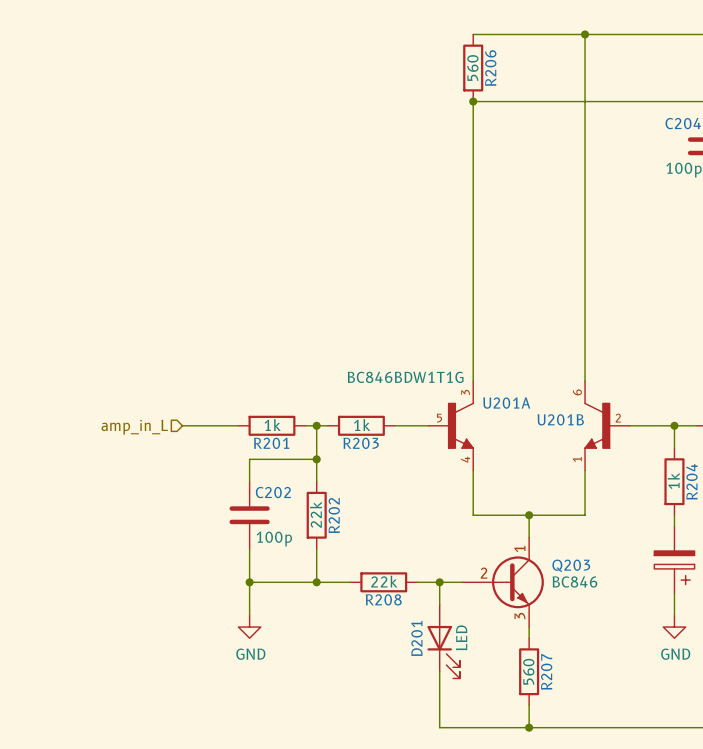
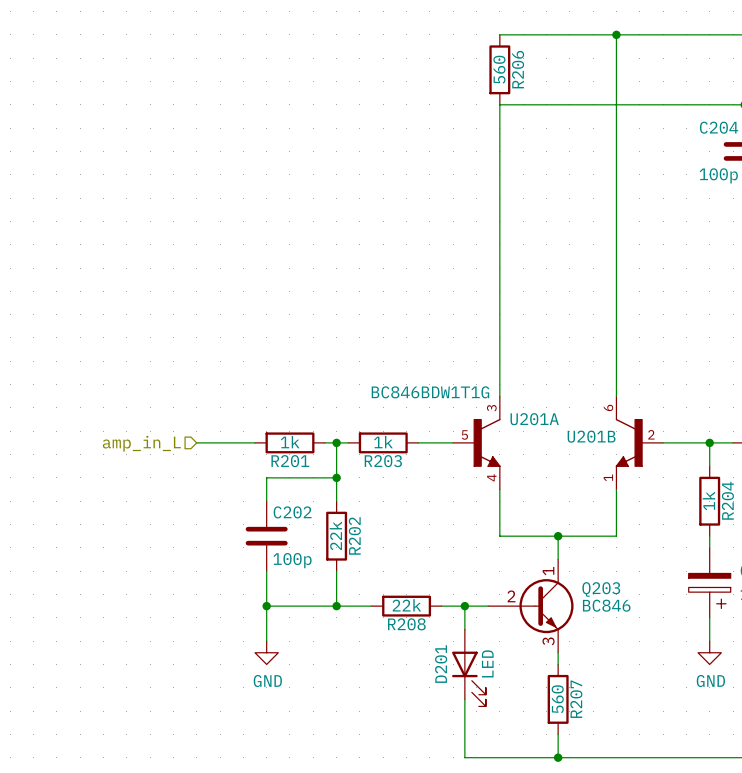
junction: (473, 101) -> none

